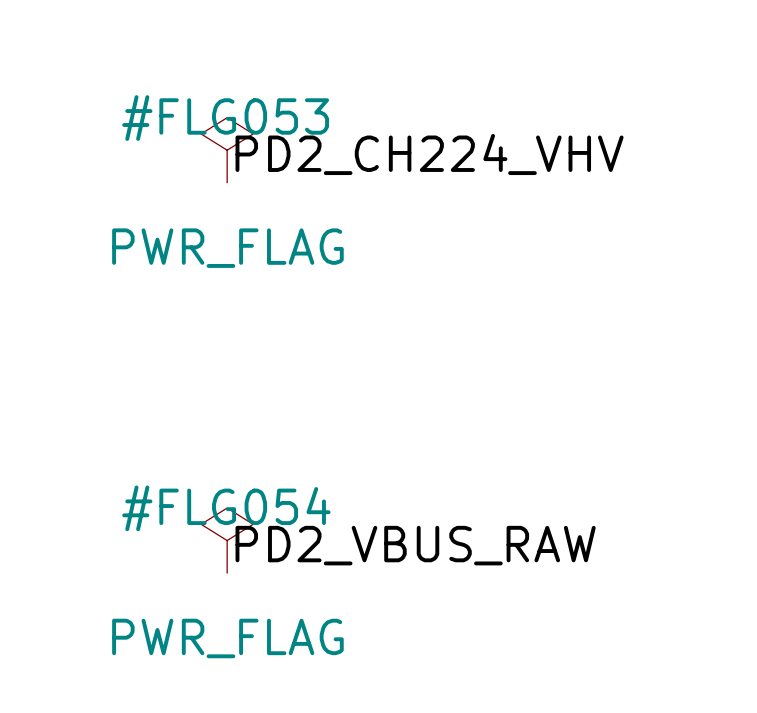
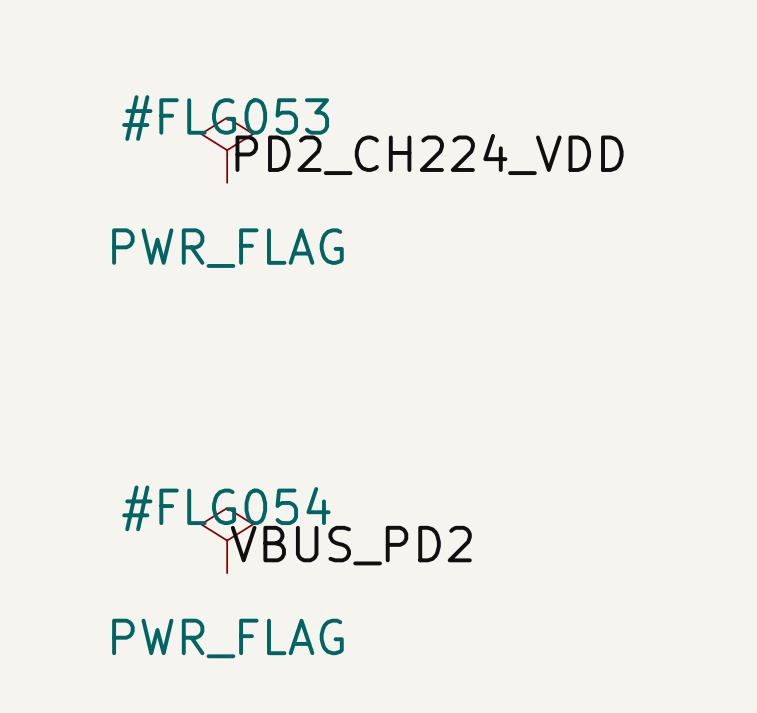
label: PD2_CH224_VHV (429, 154) -> PD2_CH224_VDD (429, 154)
label: PD2_VBUS_RAW (415, 545) -> VBUS_PD2 (351, 545)

